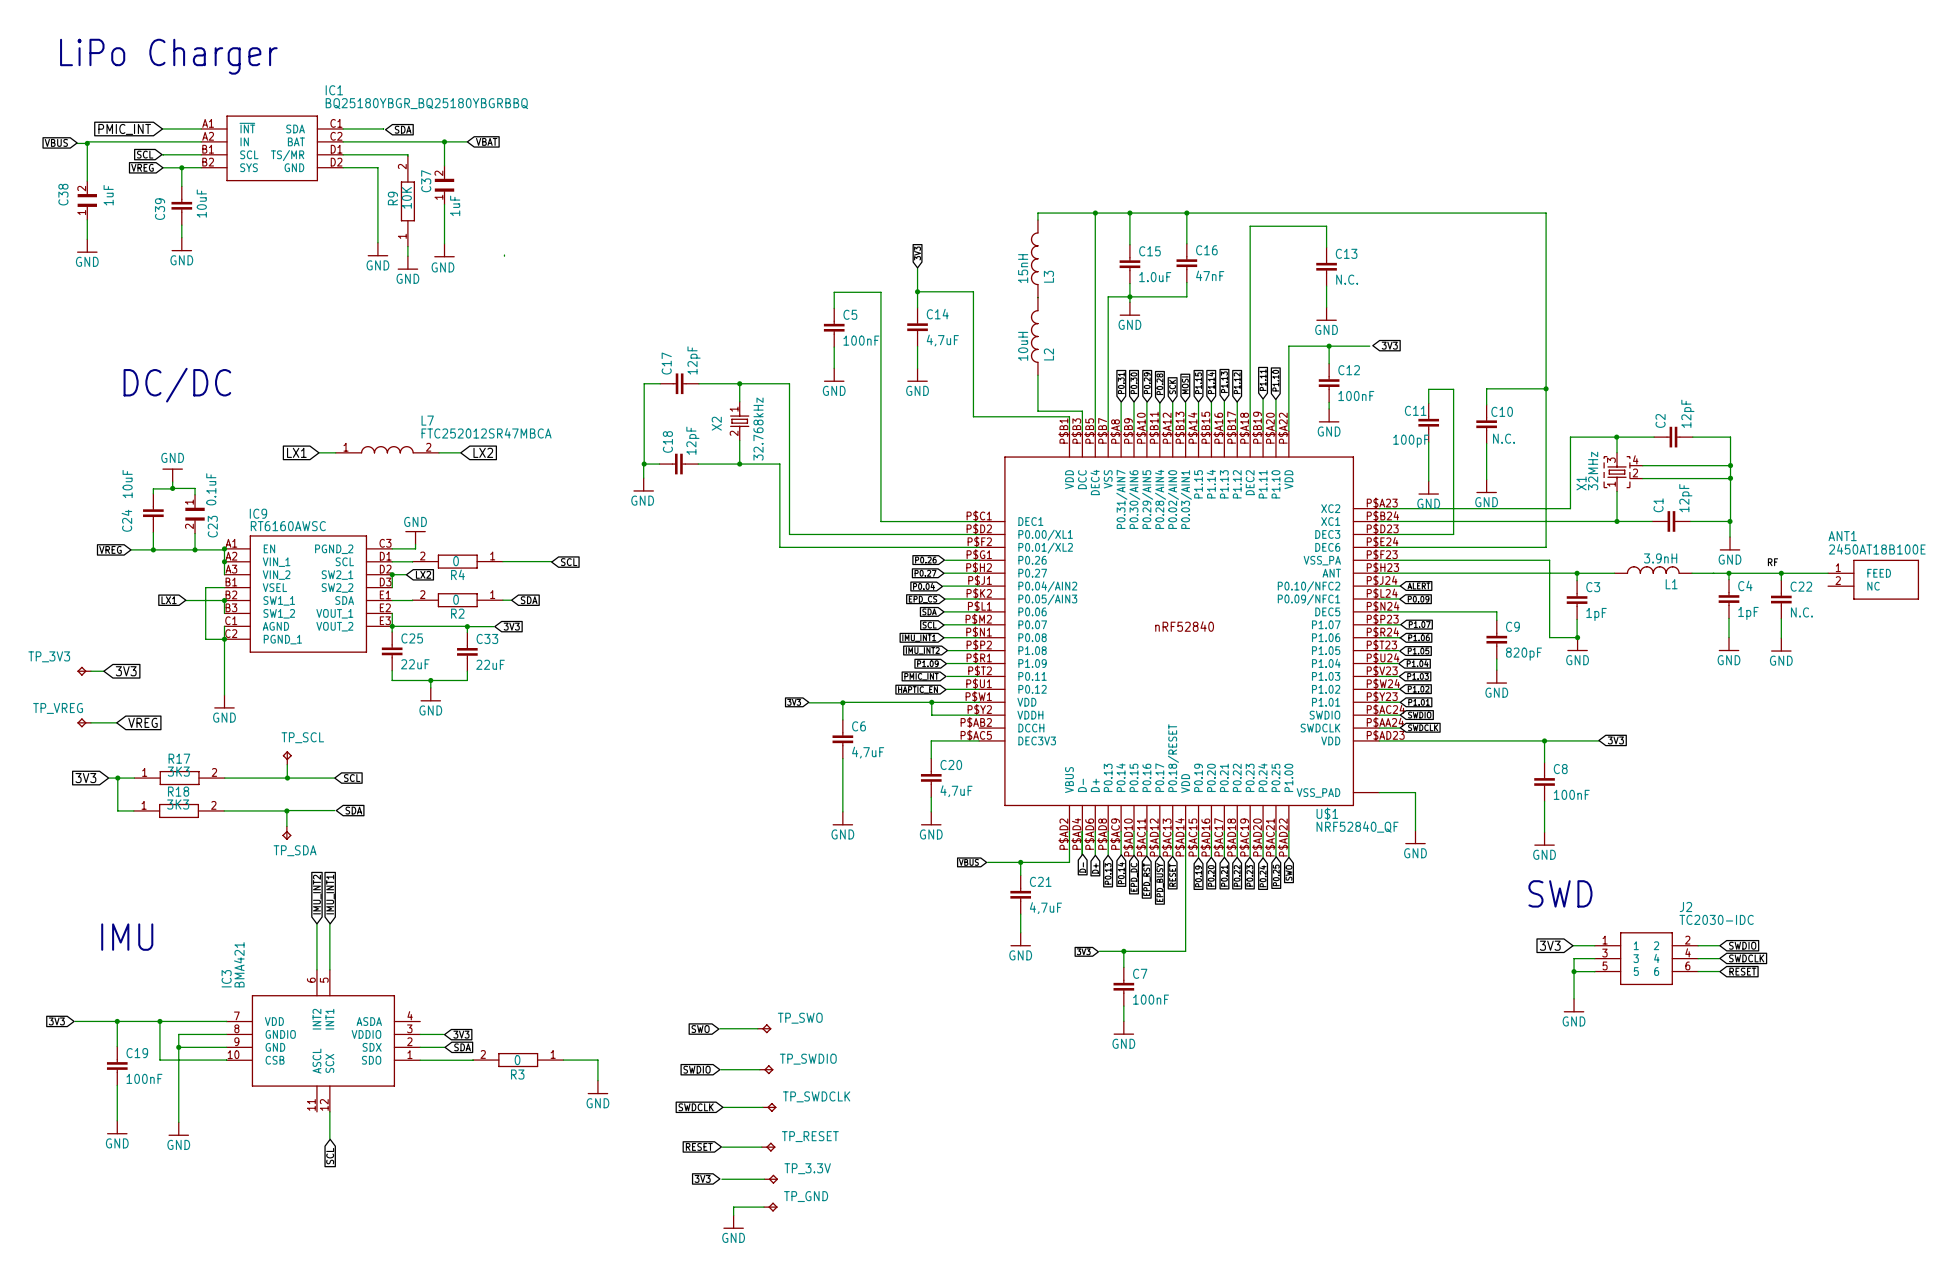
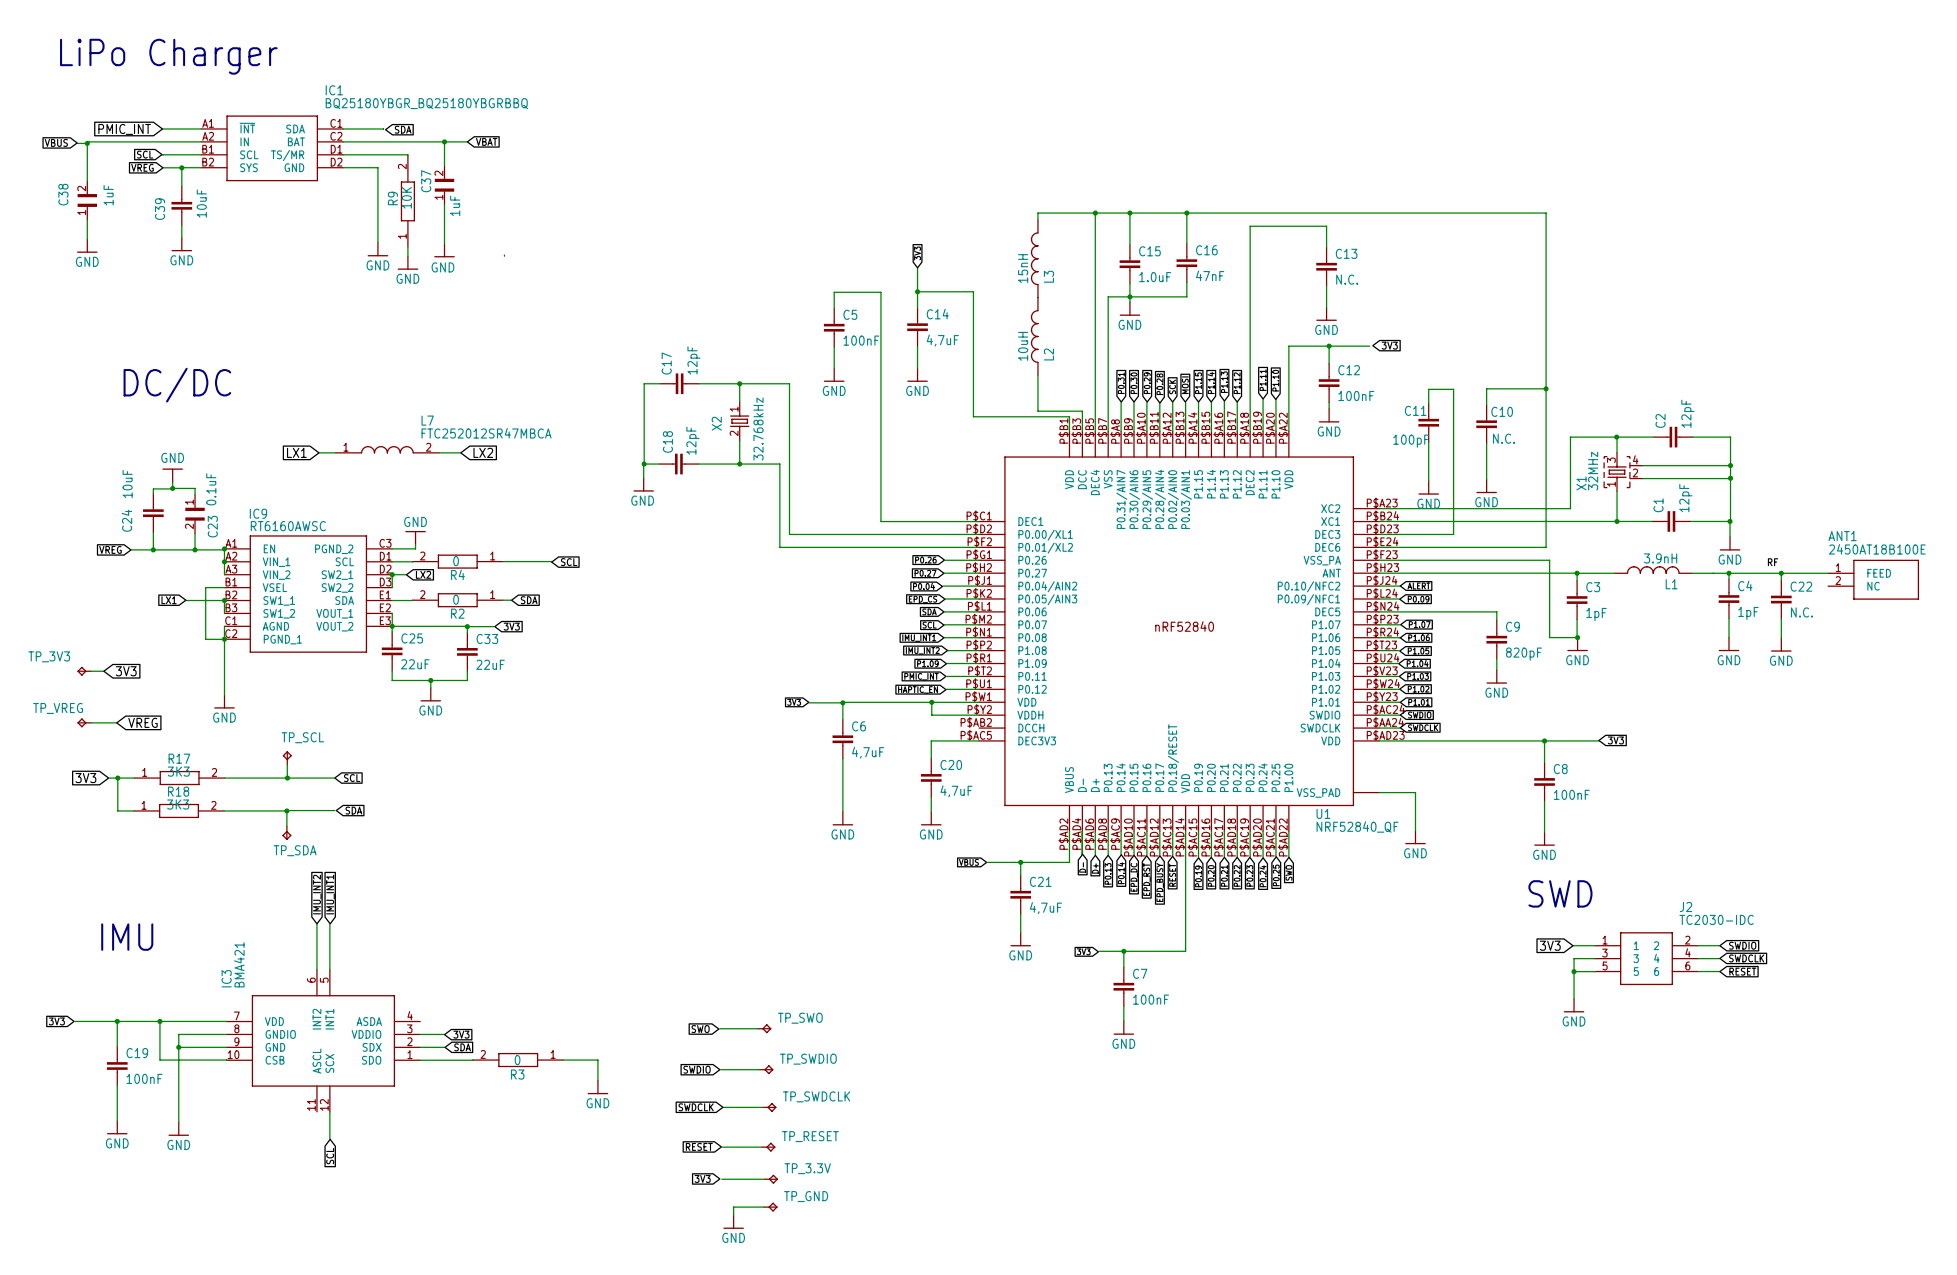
U$1 name: U$1 (1327, 813) -> U1 (1323, 813)

